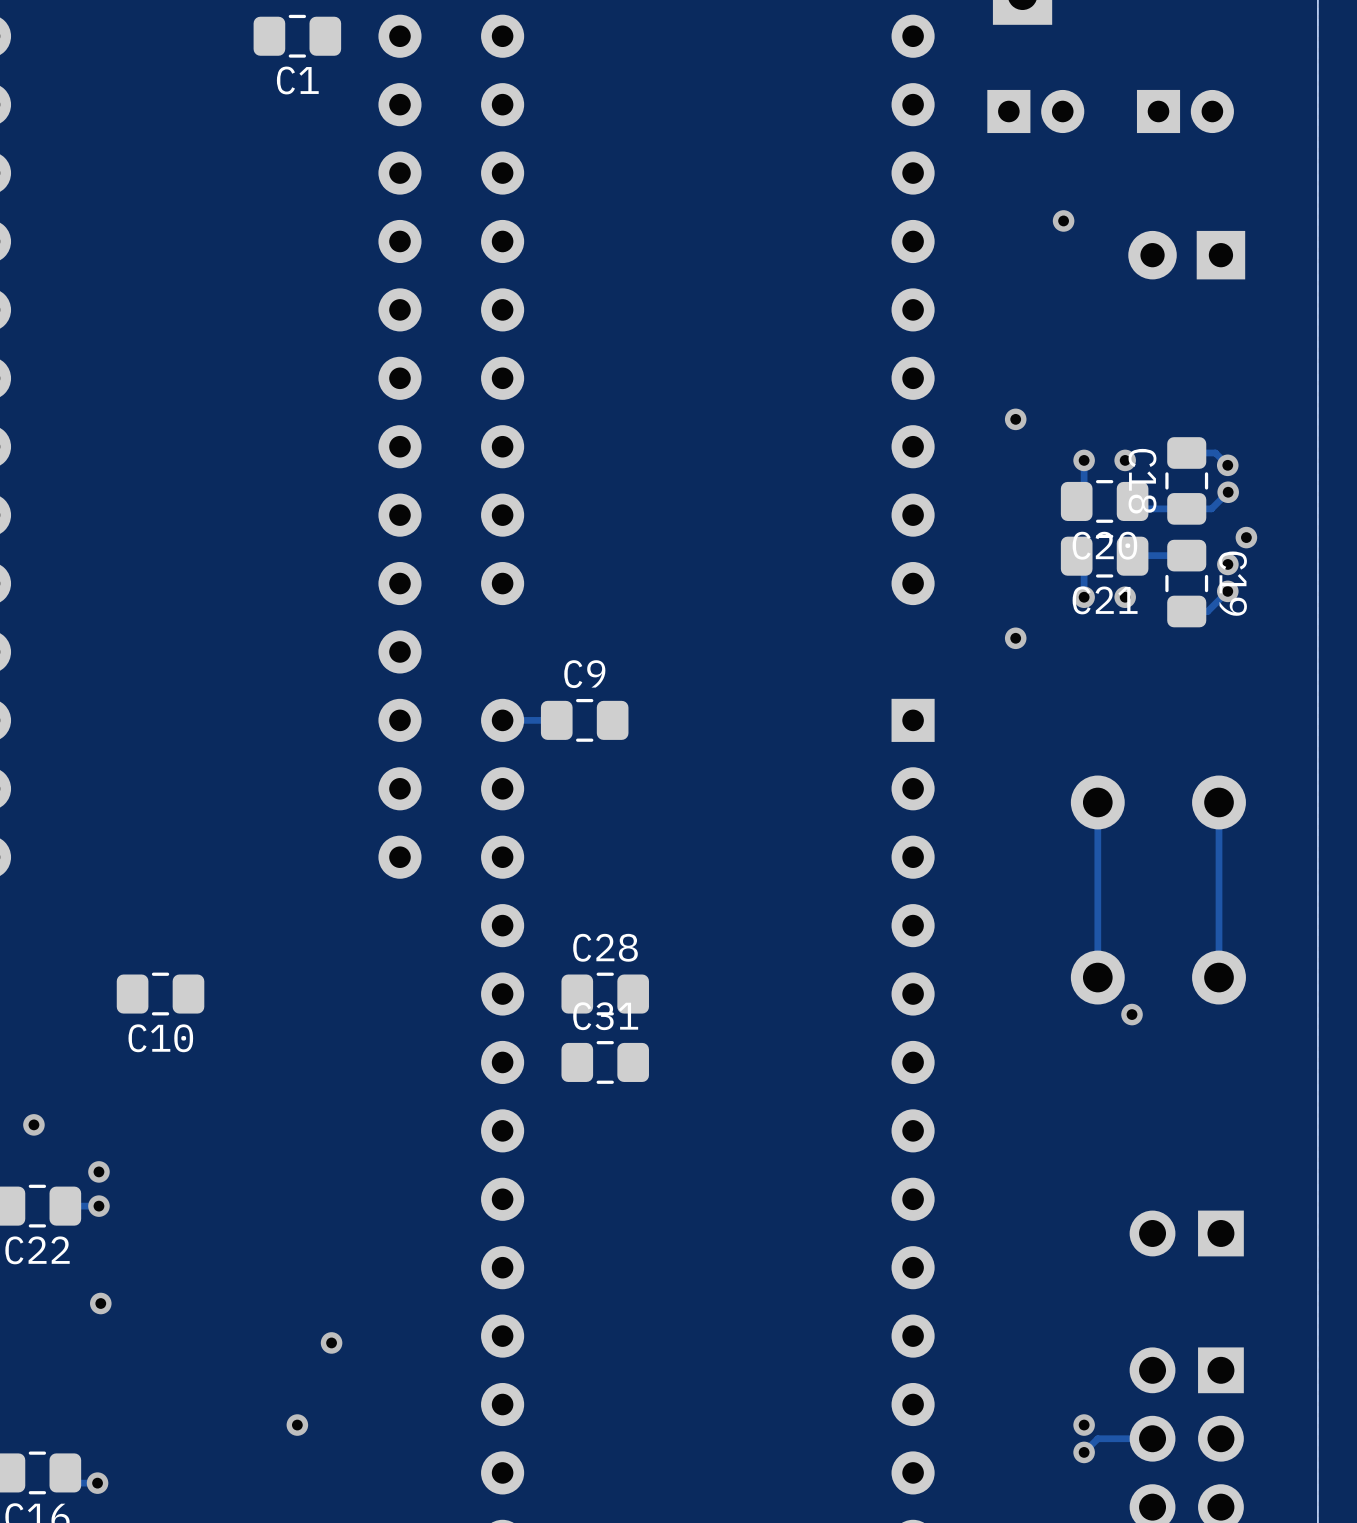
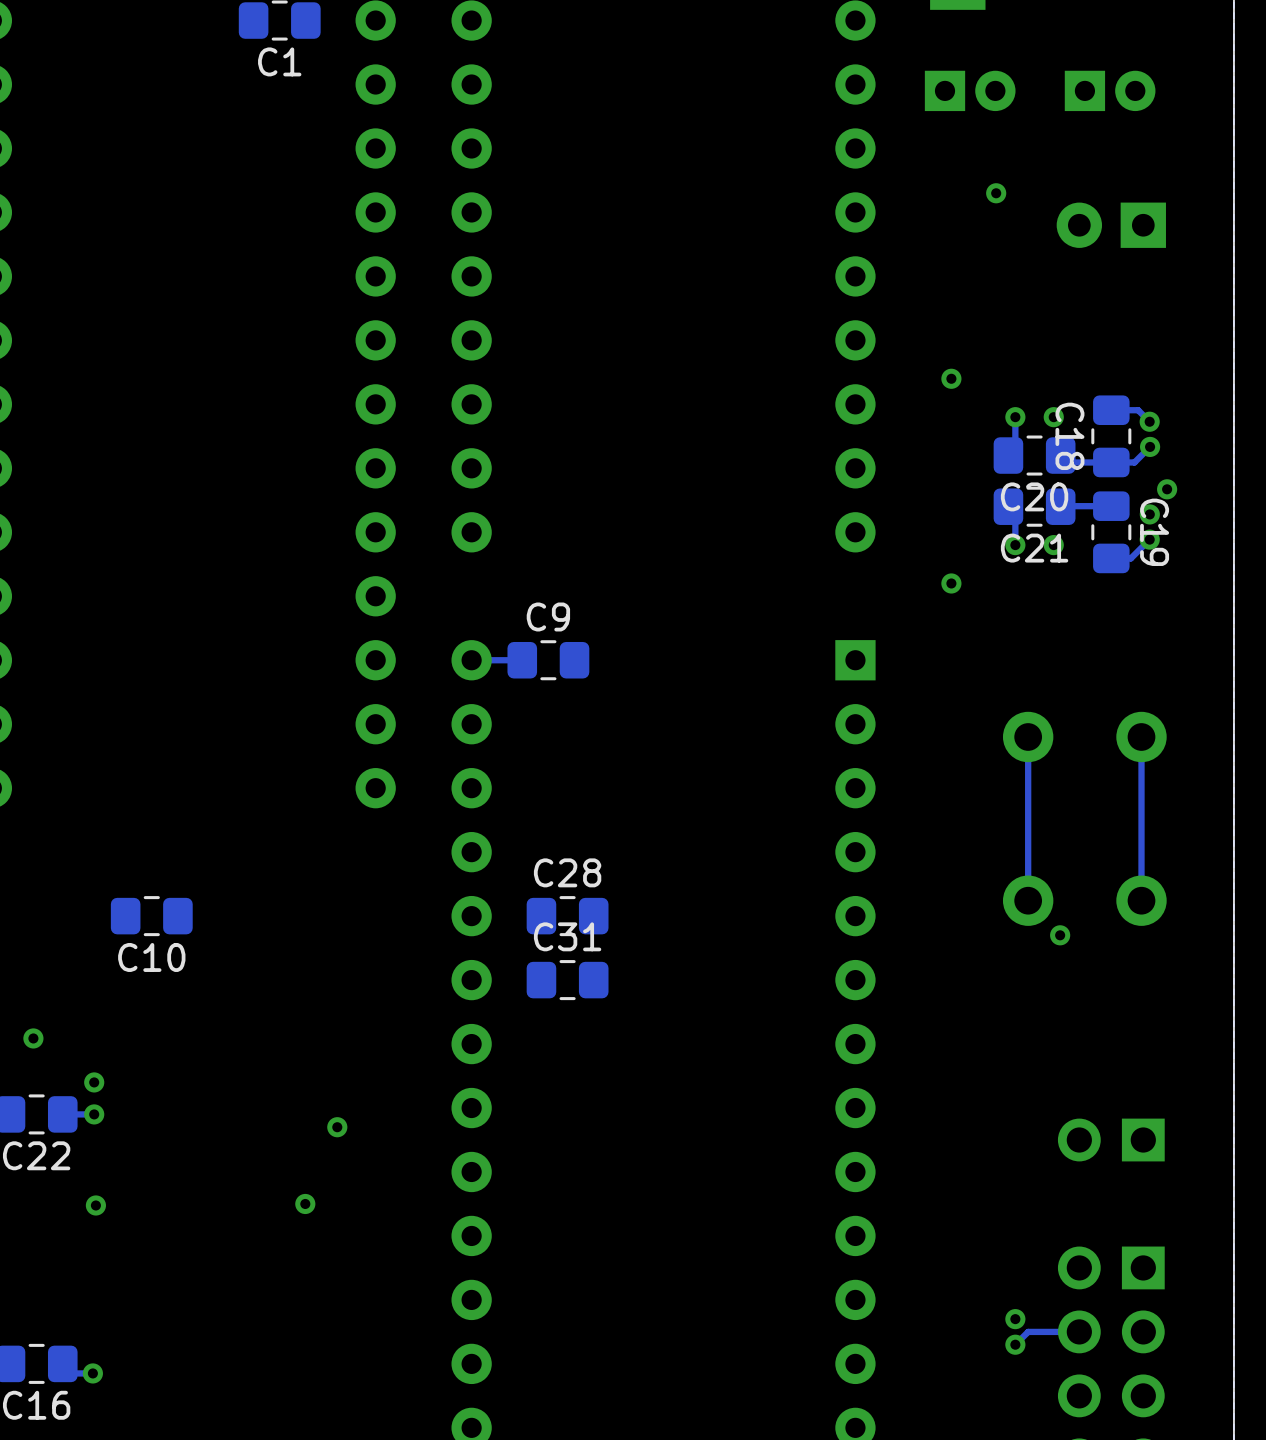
via: none -> (337, 1127)
via position: (331, 1342) -> (305, 1203)
via: (297, 1425) -> none

